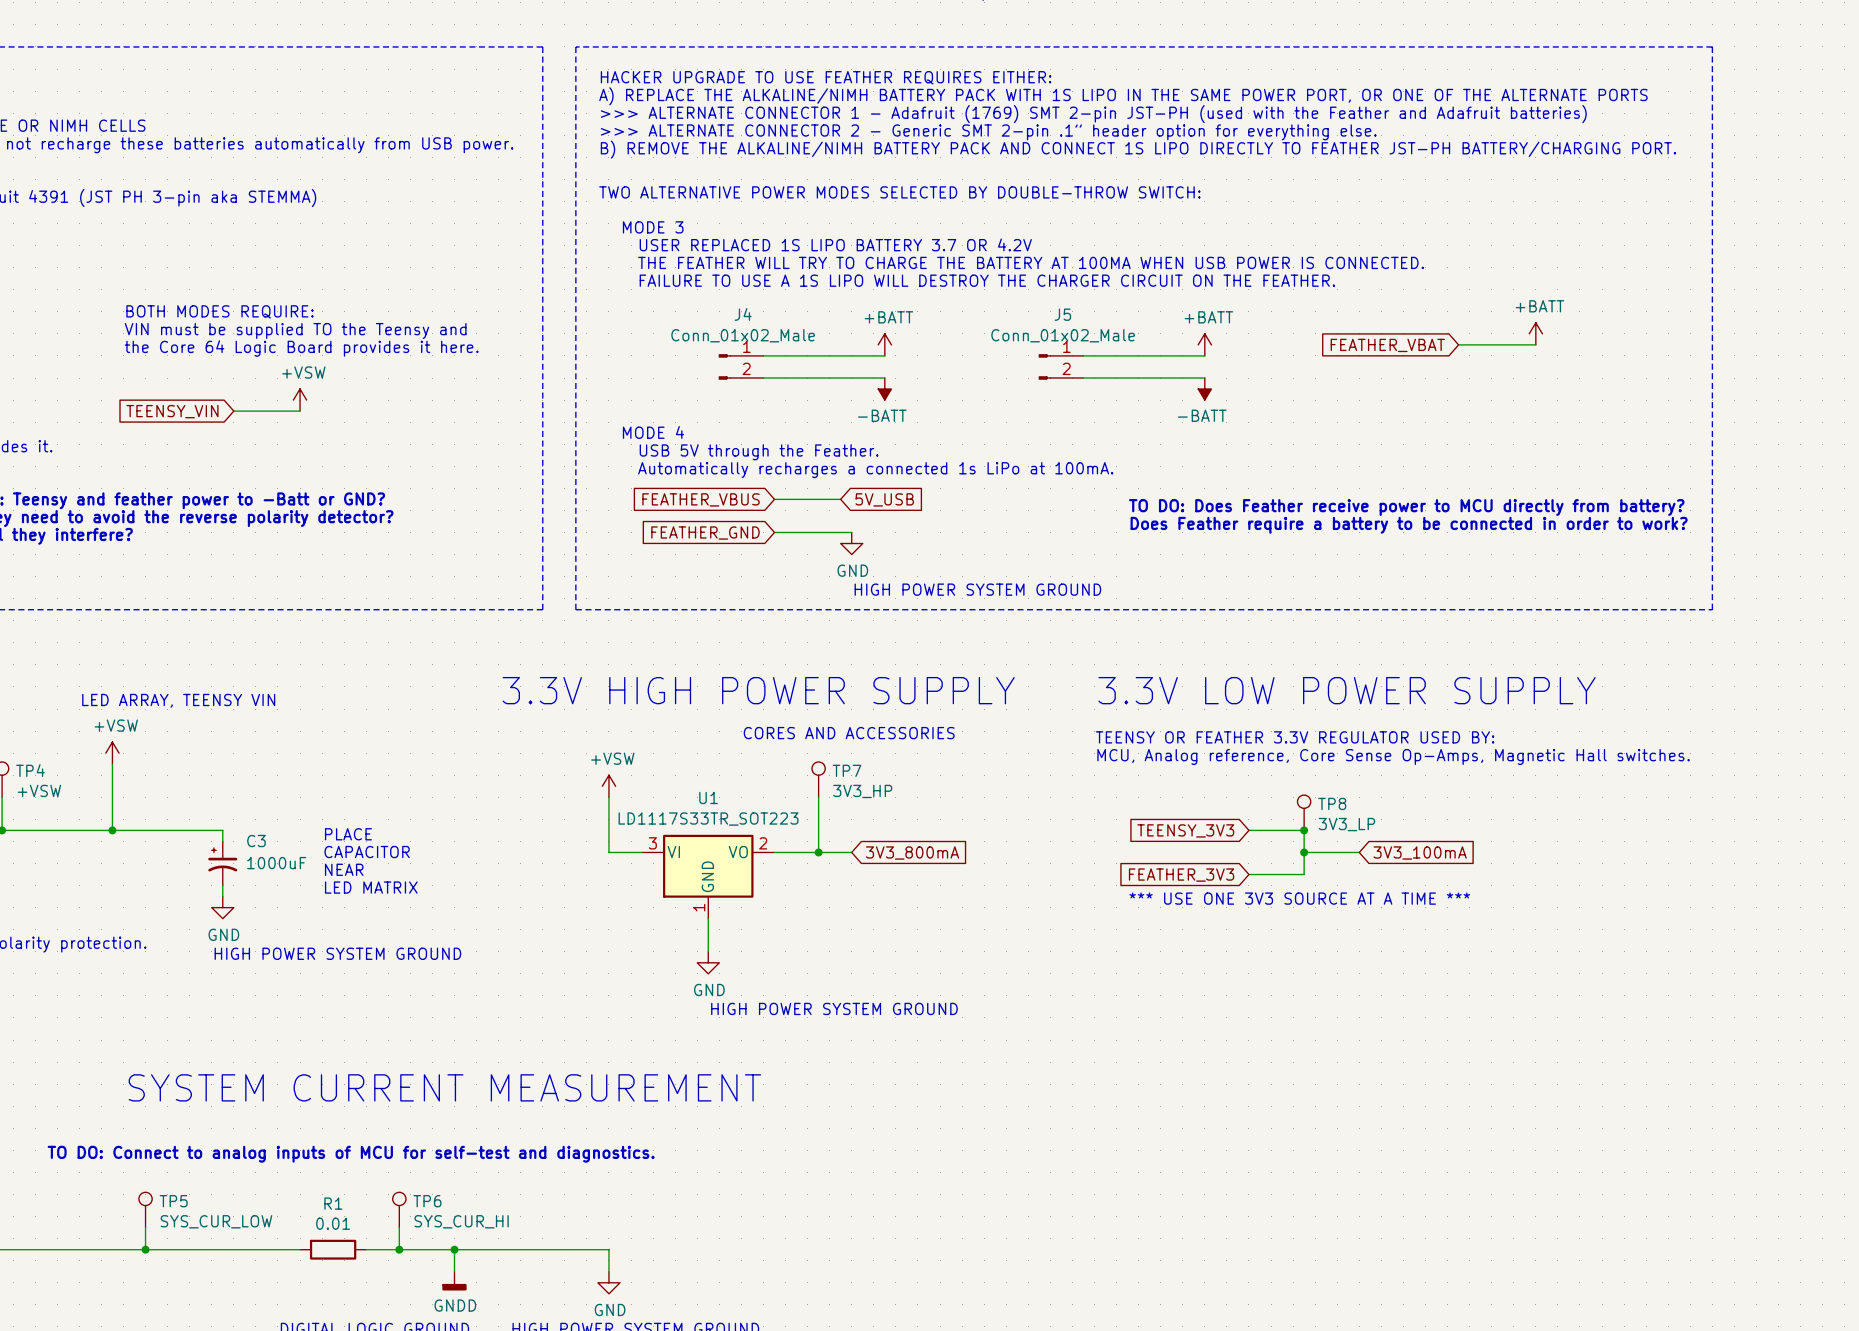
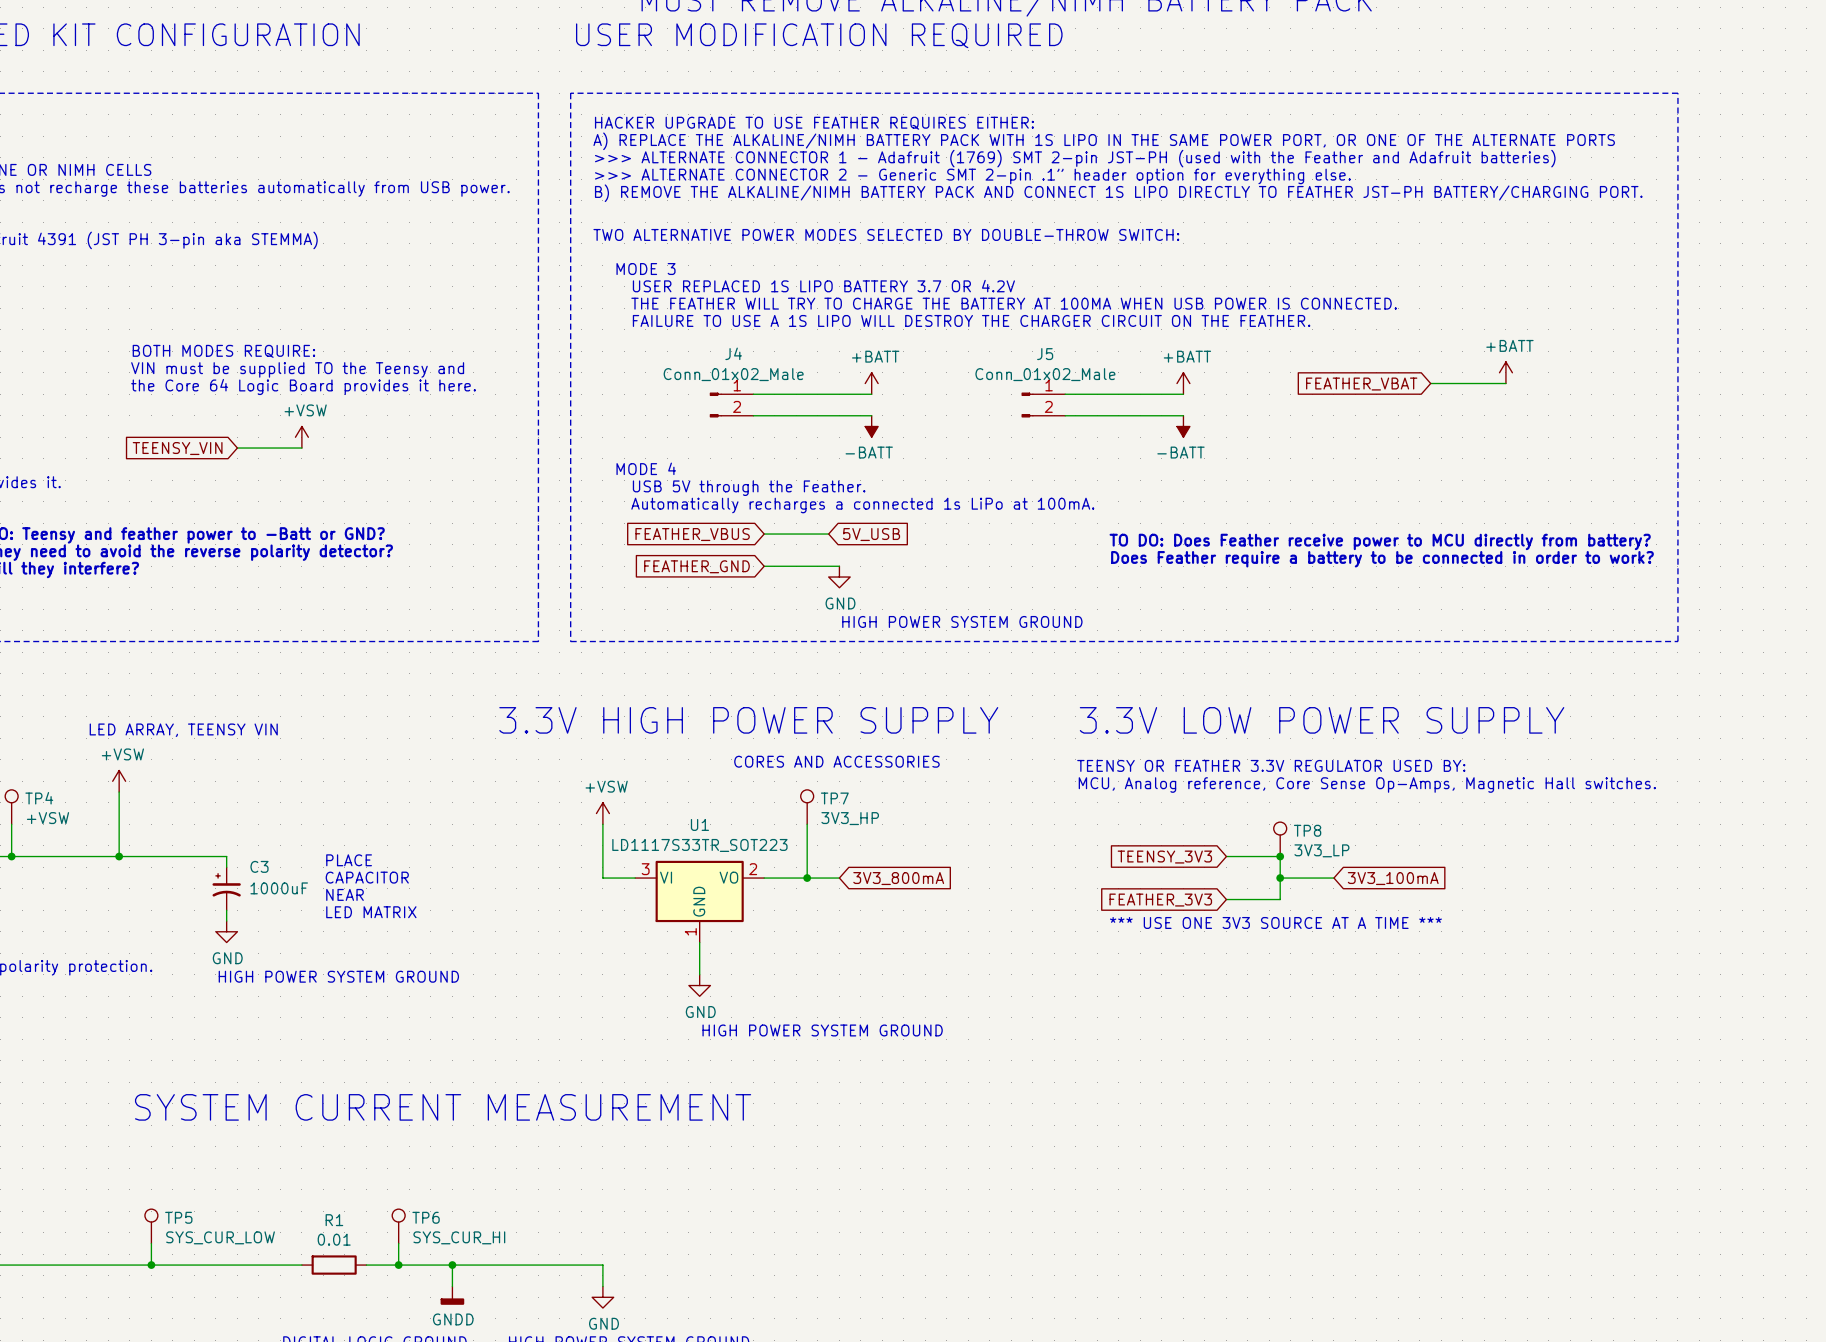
text: TO DO: Connect to analog inputs of MCU for self-test and diagnostics. (351, 1154) -> none

